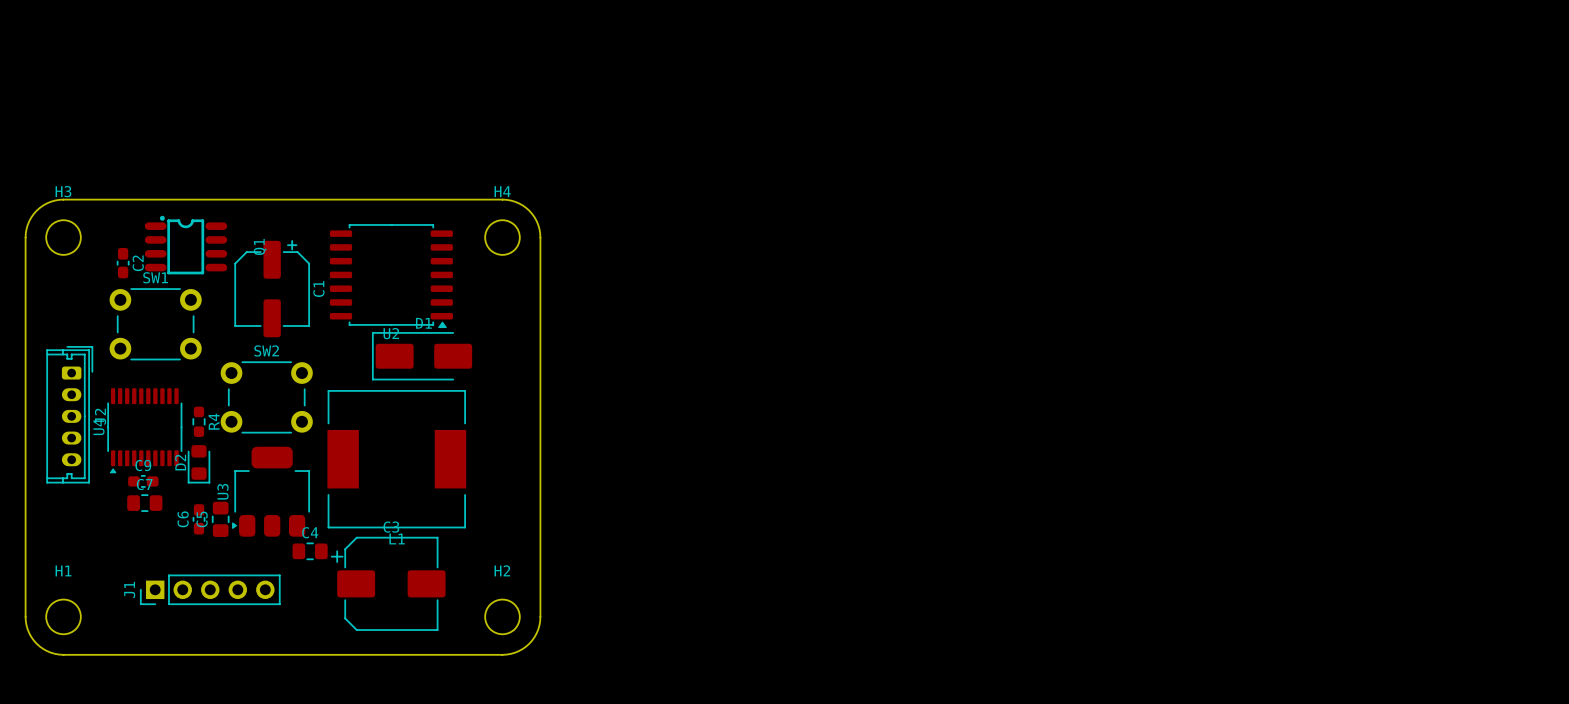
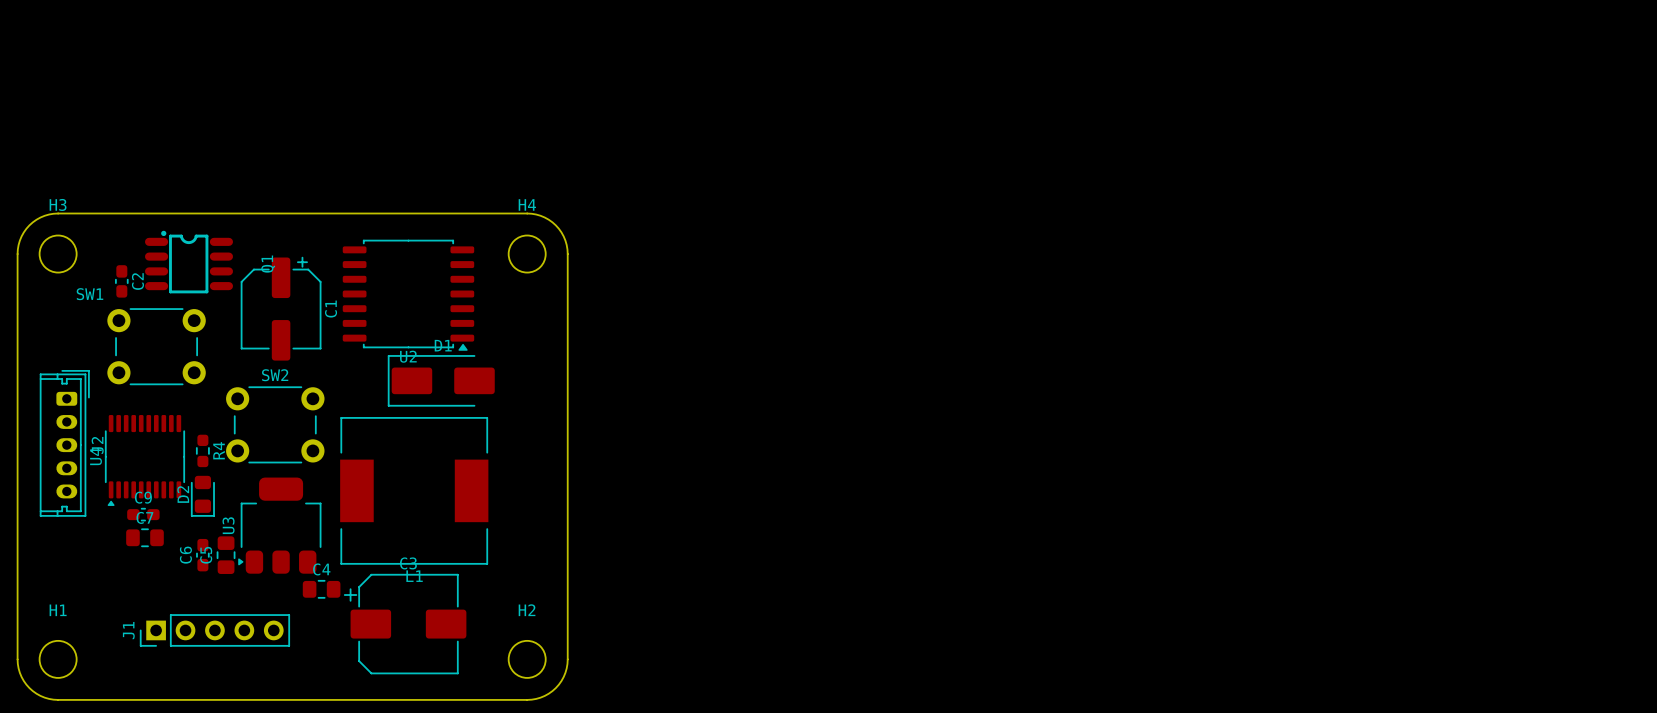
SW1 name position: SW1 (155, 277) -> SW1 (89, 294)

